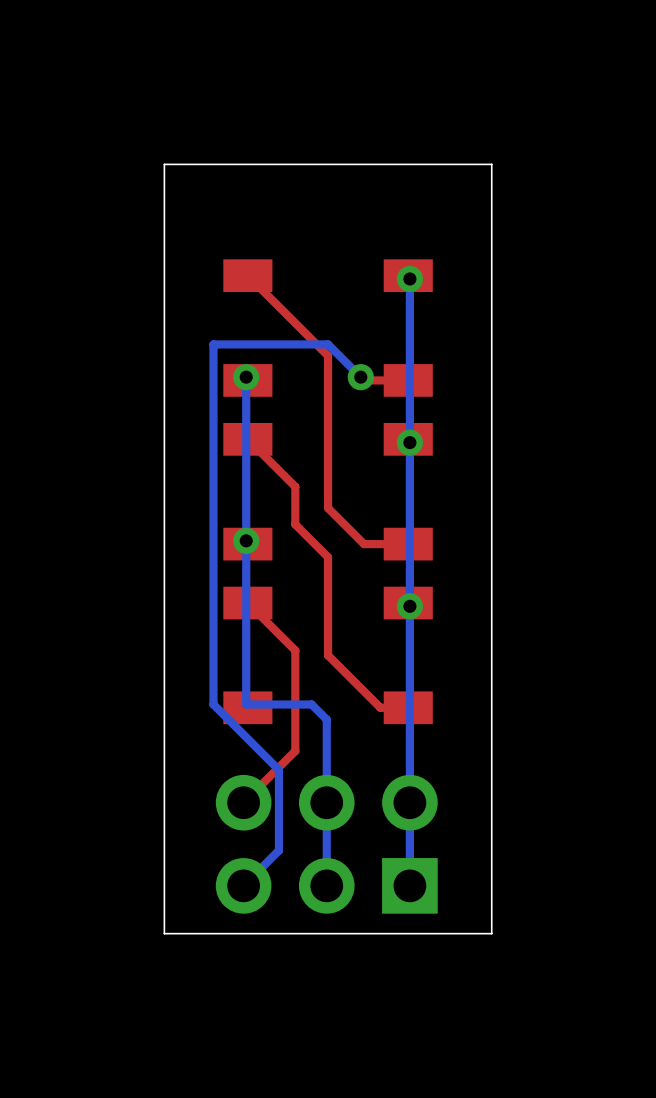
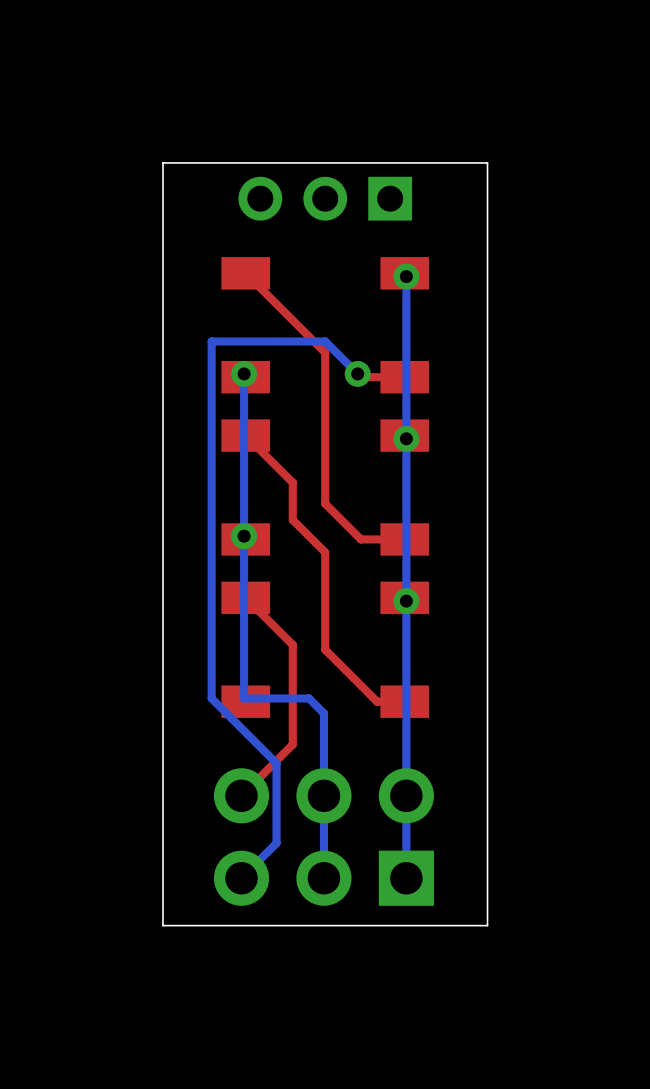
part: none -> (325, 198)

